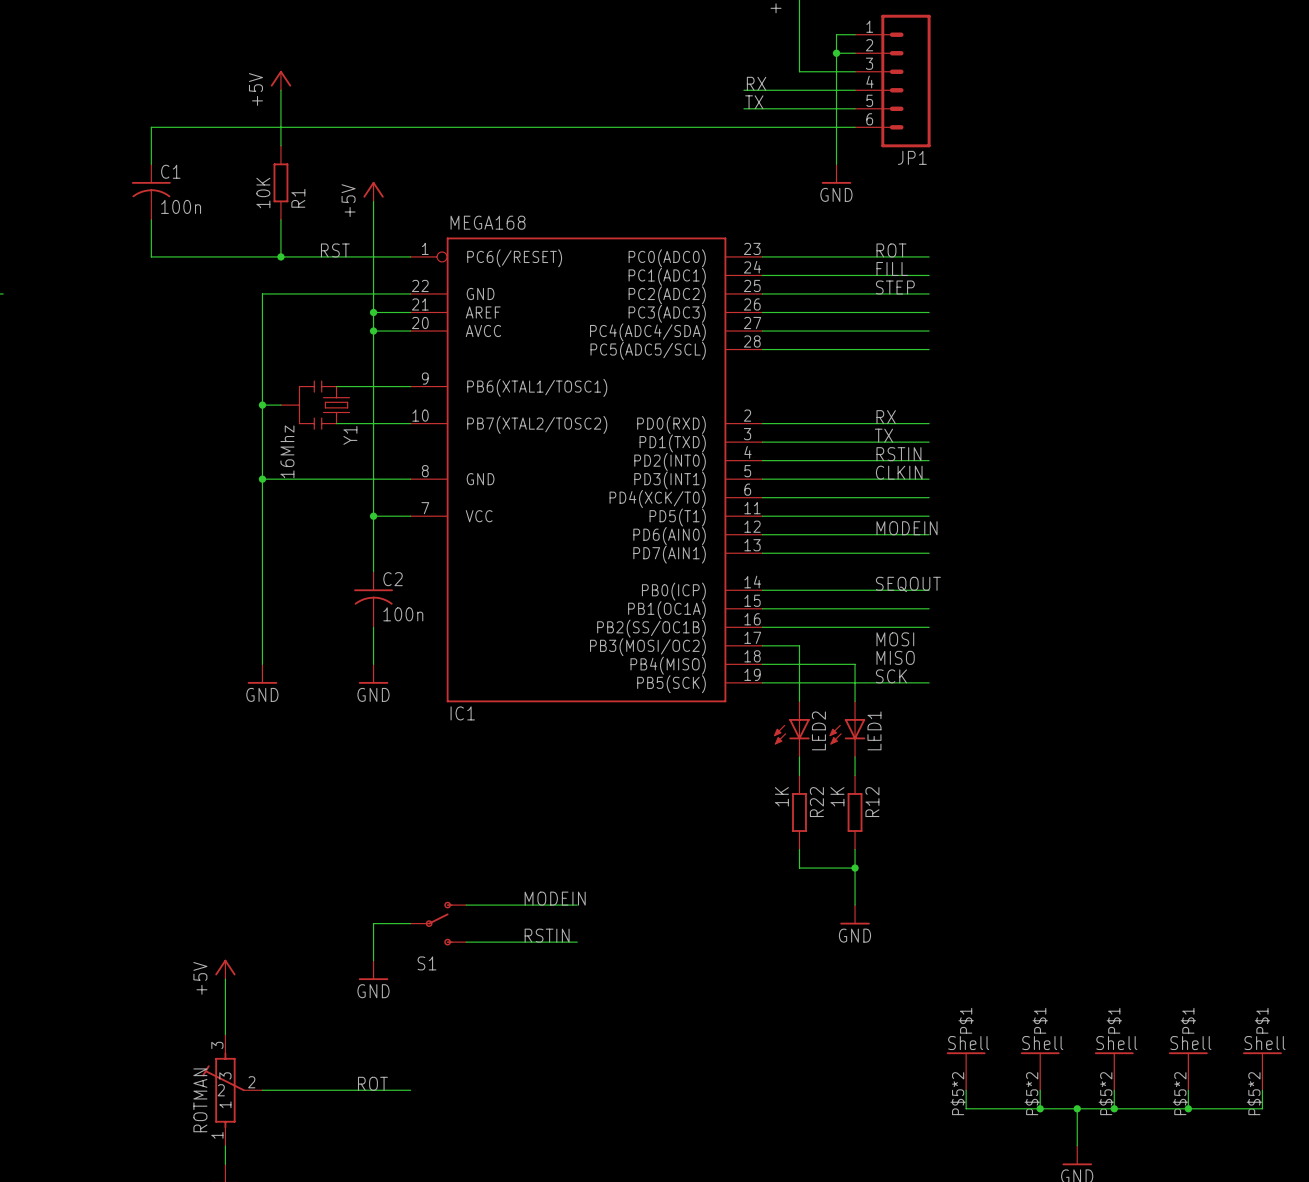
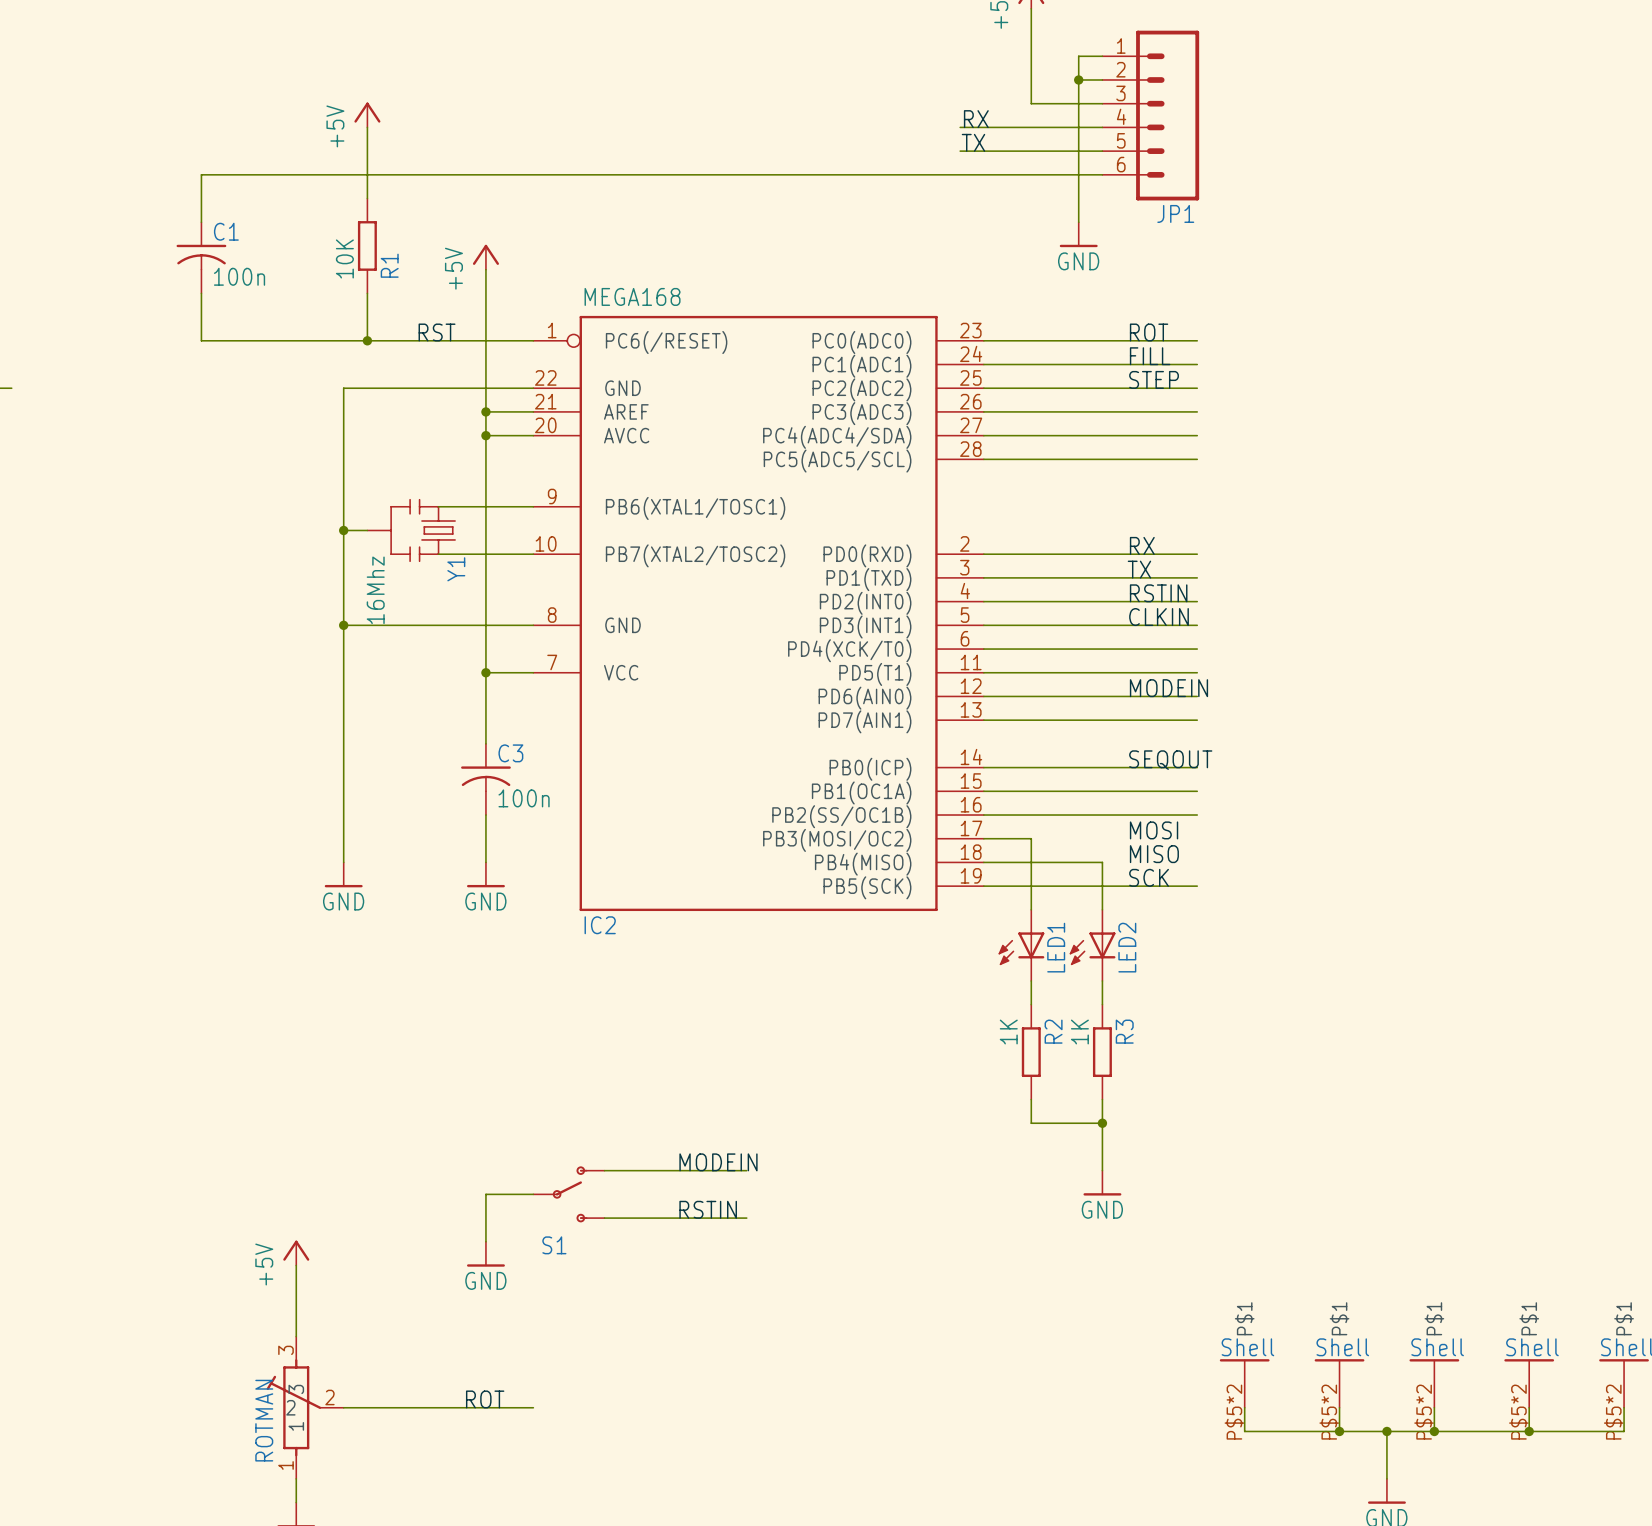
C2 name: C2 (393, 579) -> C3 (510, 753)
IC1 name: IC1 (462, 713) -> IC2 (600, 925)
LED2 name: LED2 (818, 730) -> LED1 (1056, 947)
LED1 name: LED1 (874, 730) -> LED2 (1127, 947)
R22 name: R22 (816, 802) -> R2 (1053, 1031)
R12 name: R12 (872, 802) -> R3 (1124, 1031)

